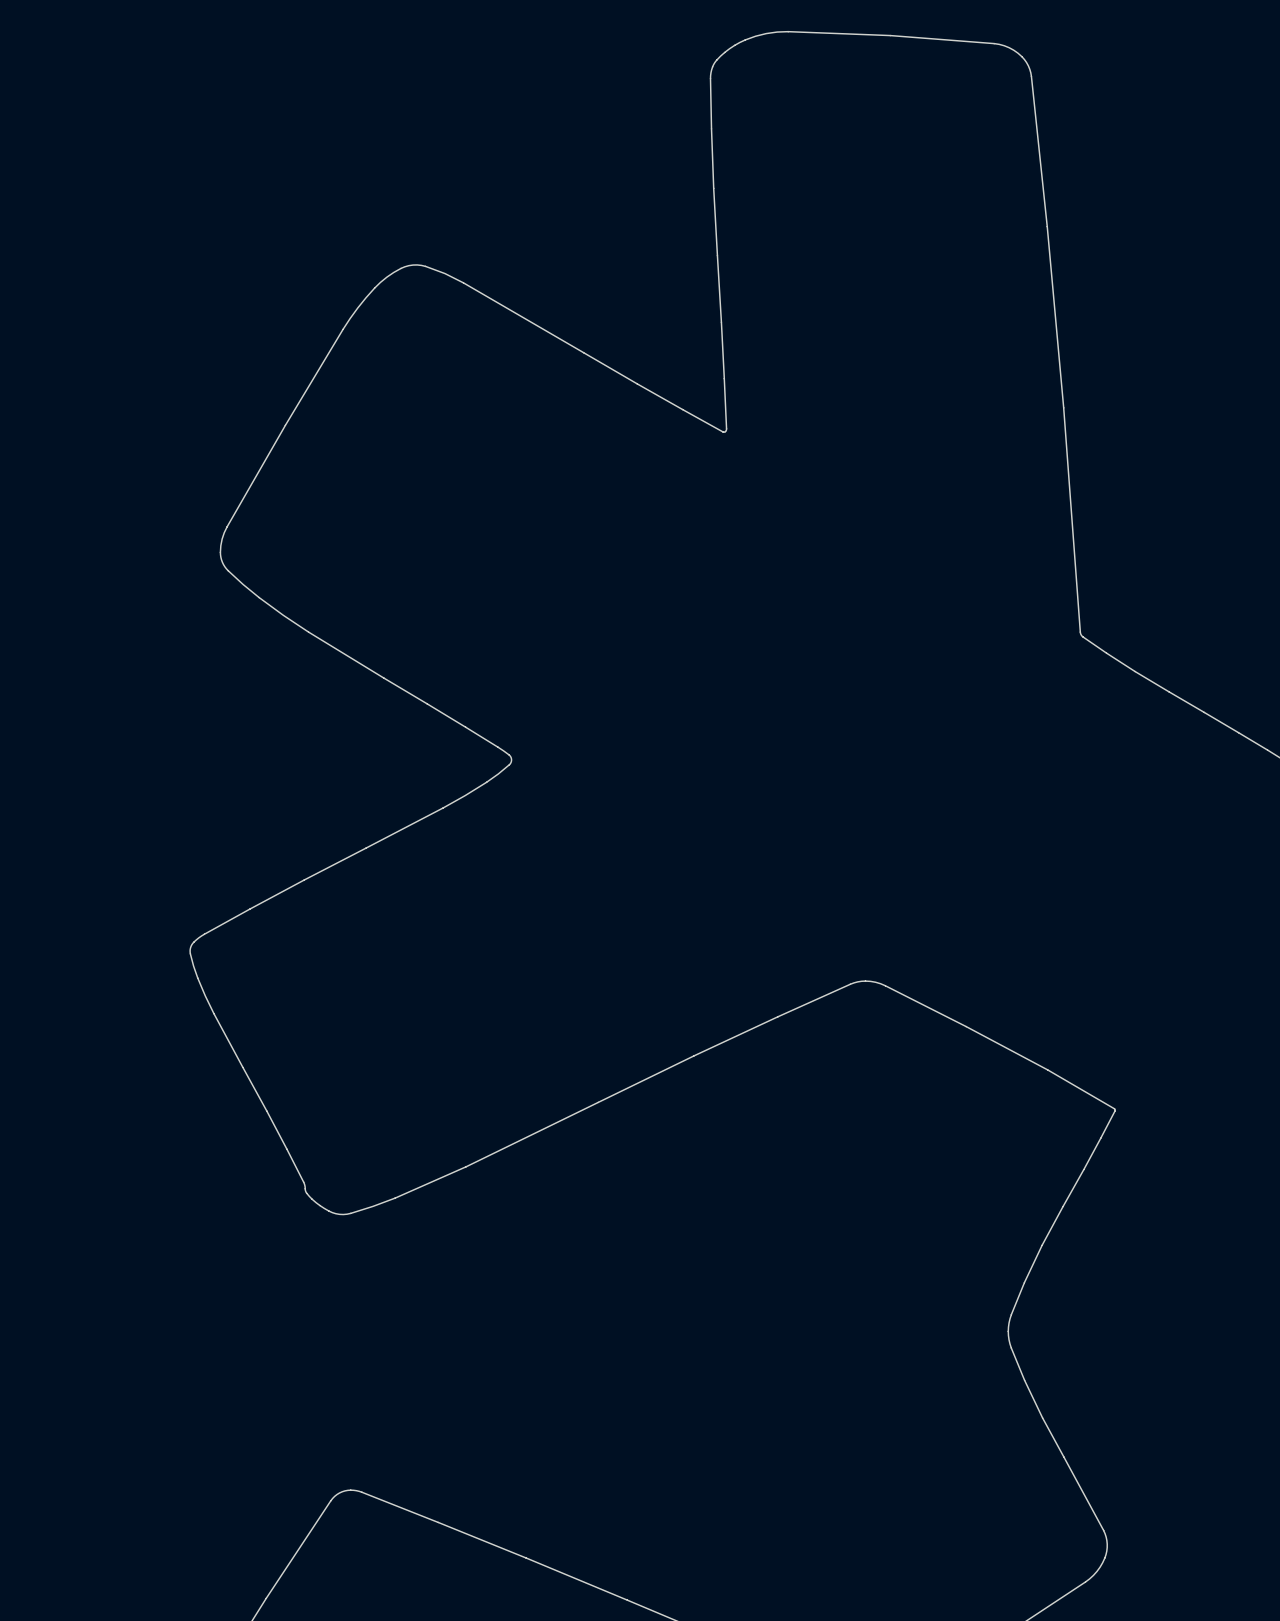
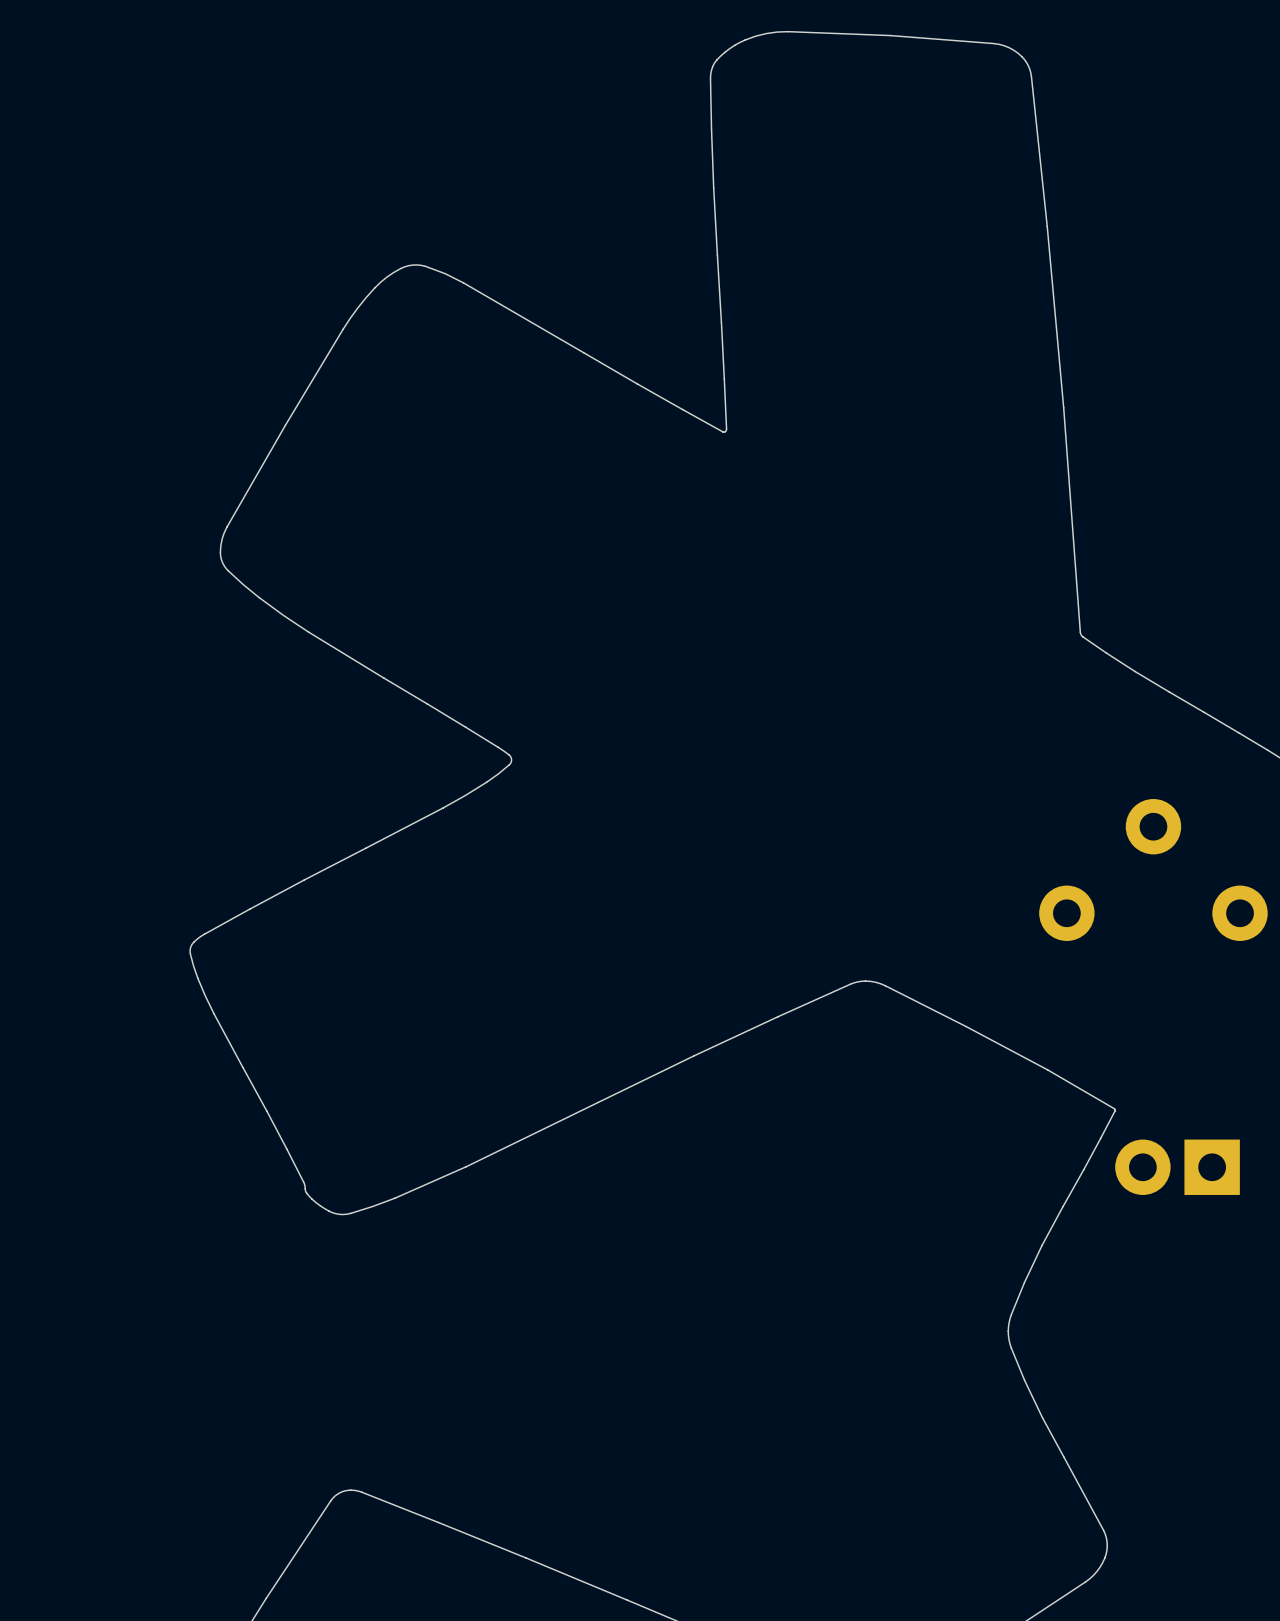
part: none -> (1153, 869)
part: none -> (1177, 1167)

